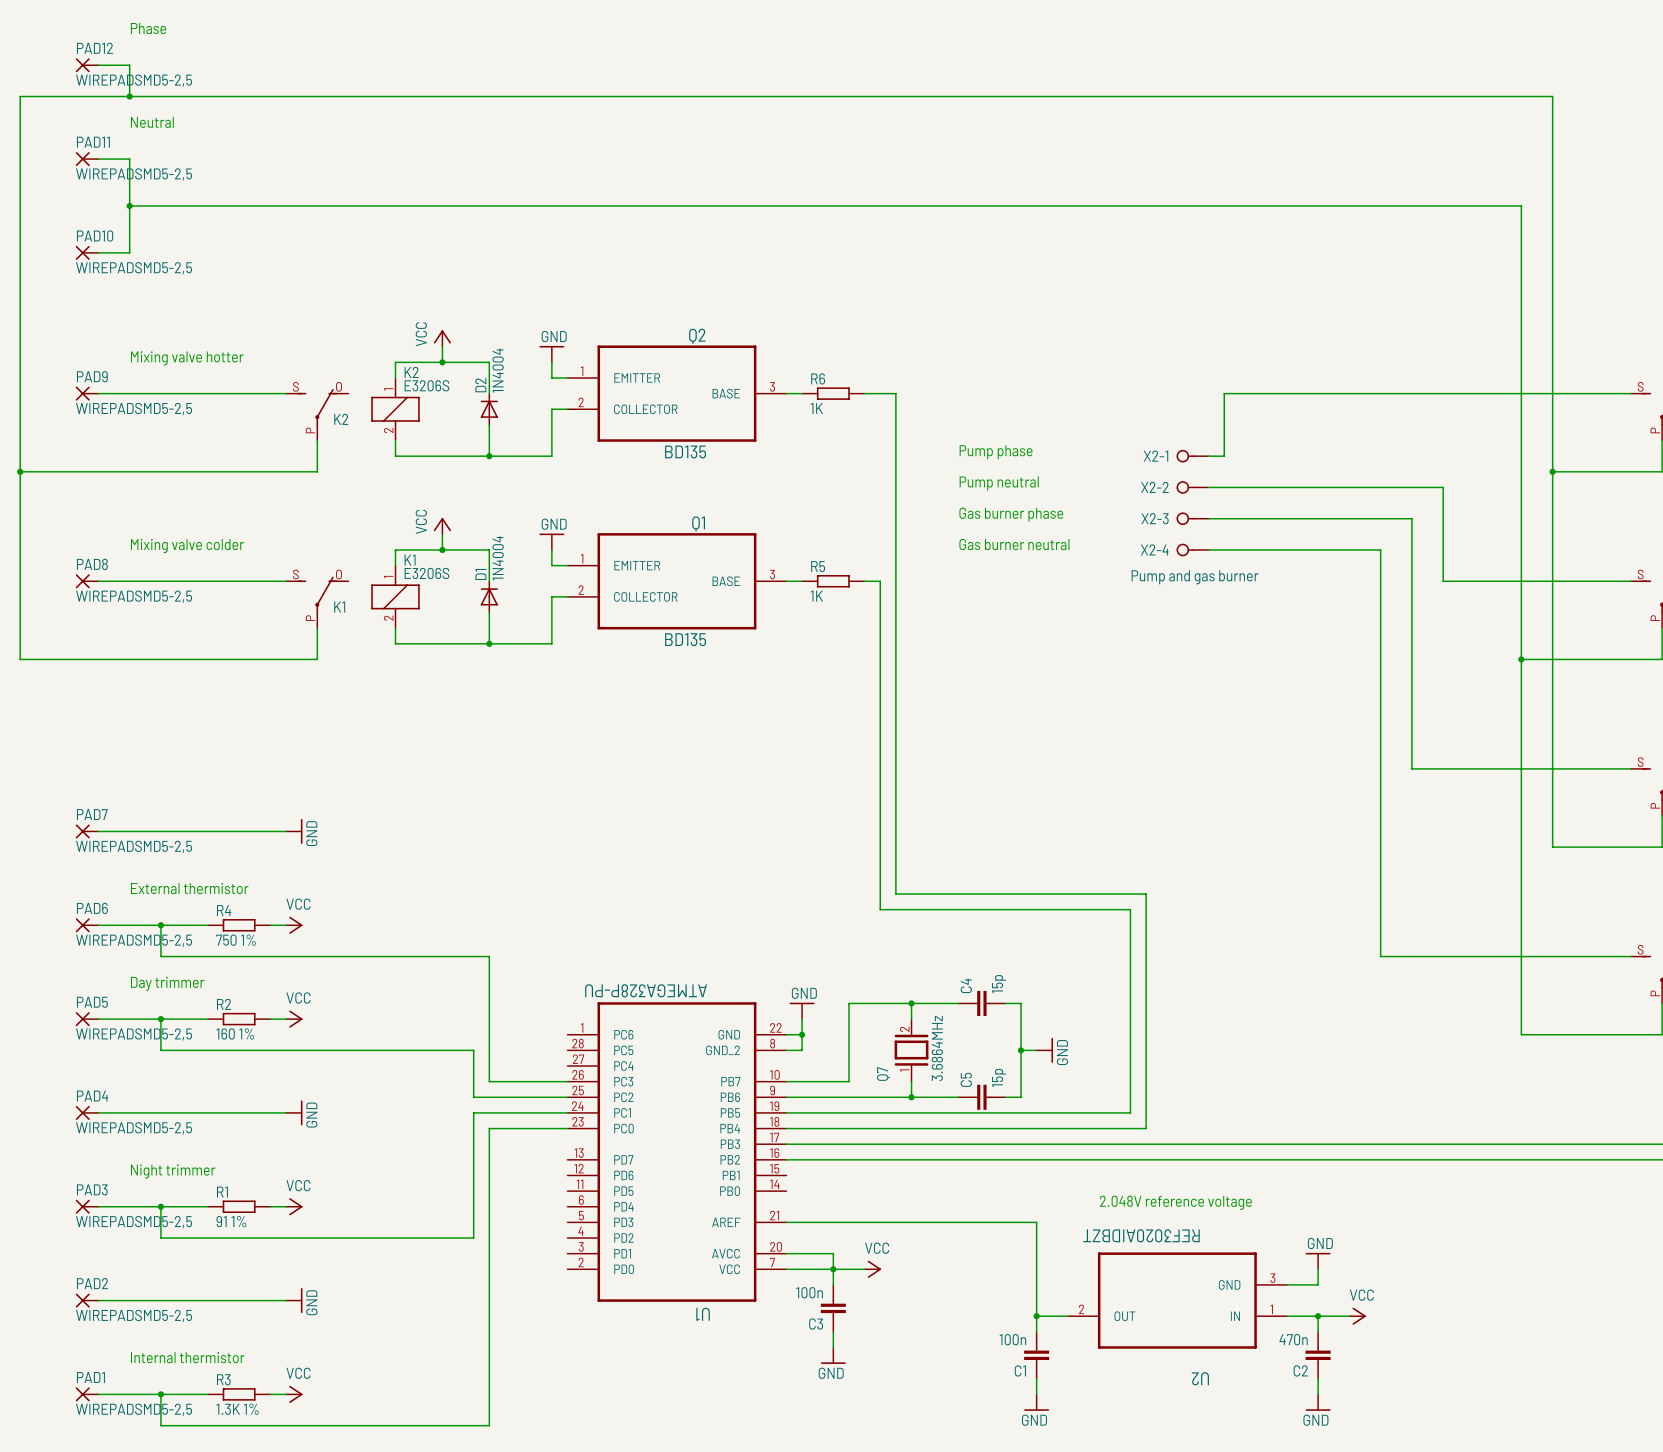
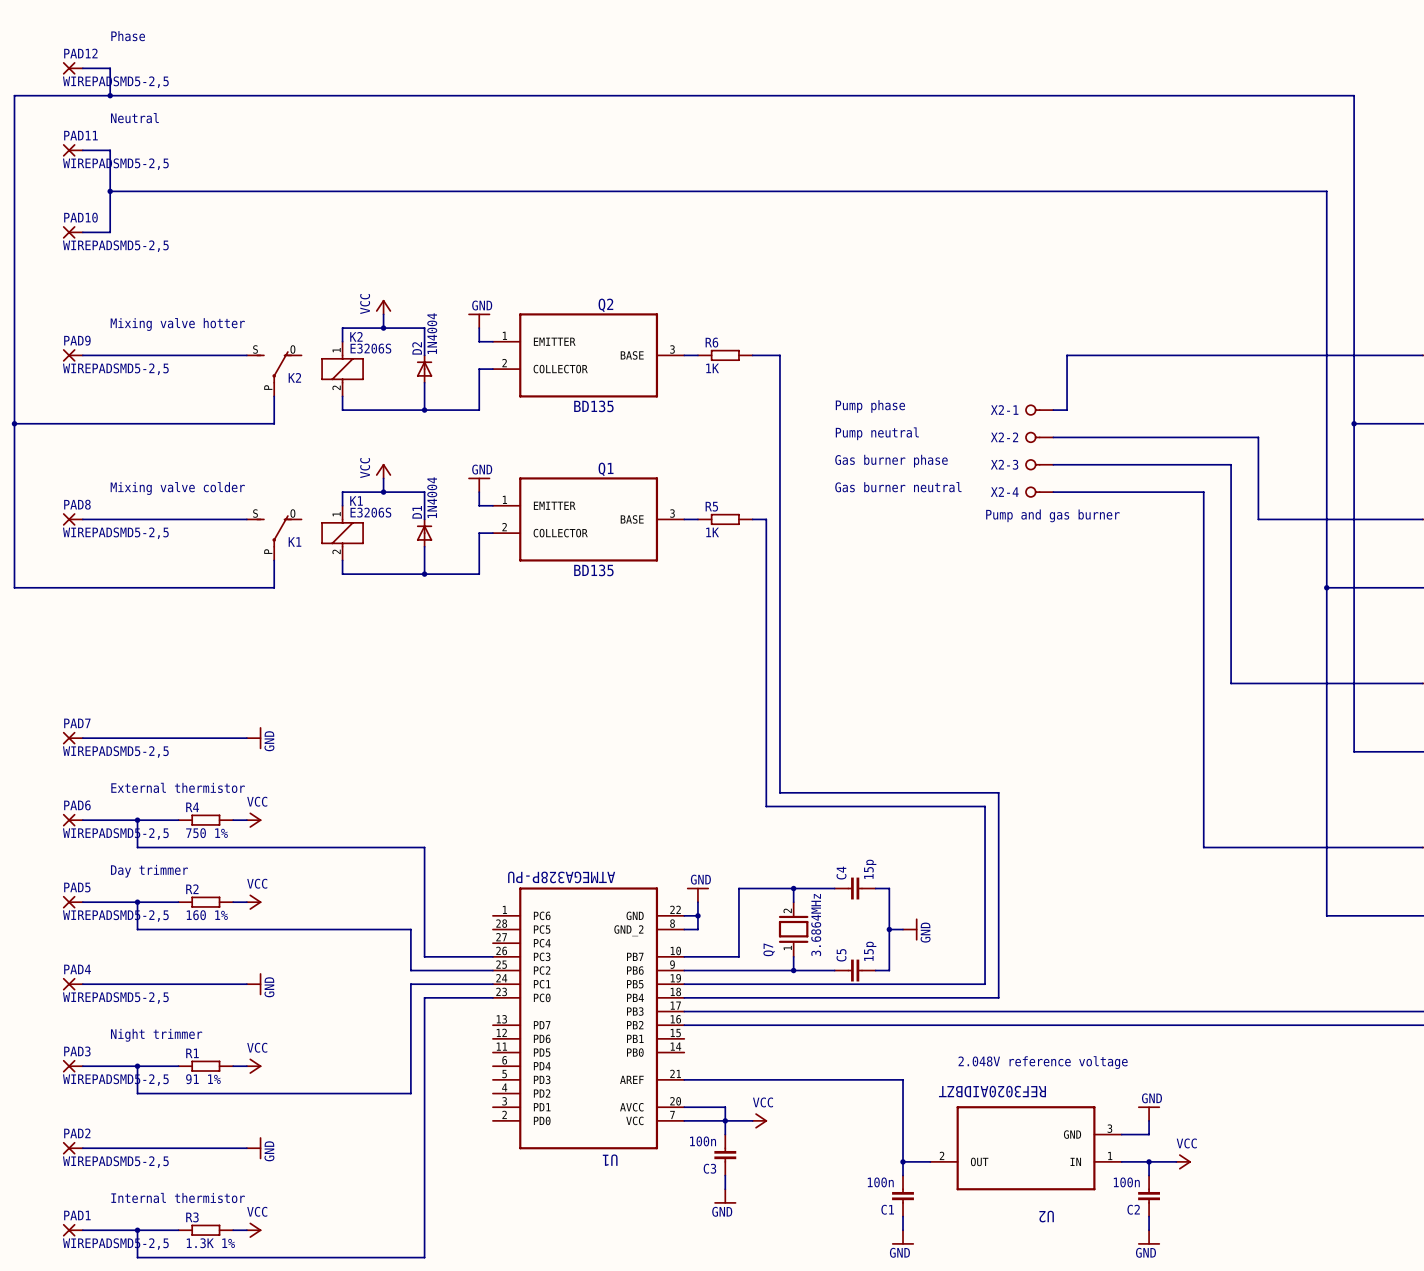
C2 value: 470n (1293, 1339) -> 100n (1126, 1182)

